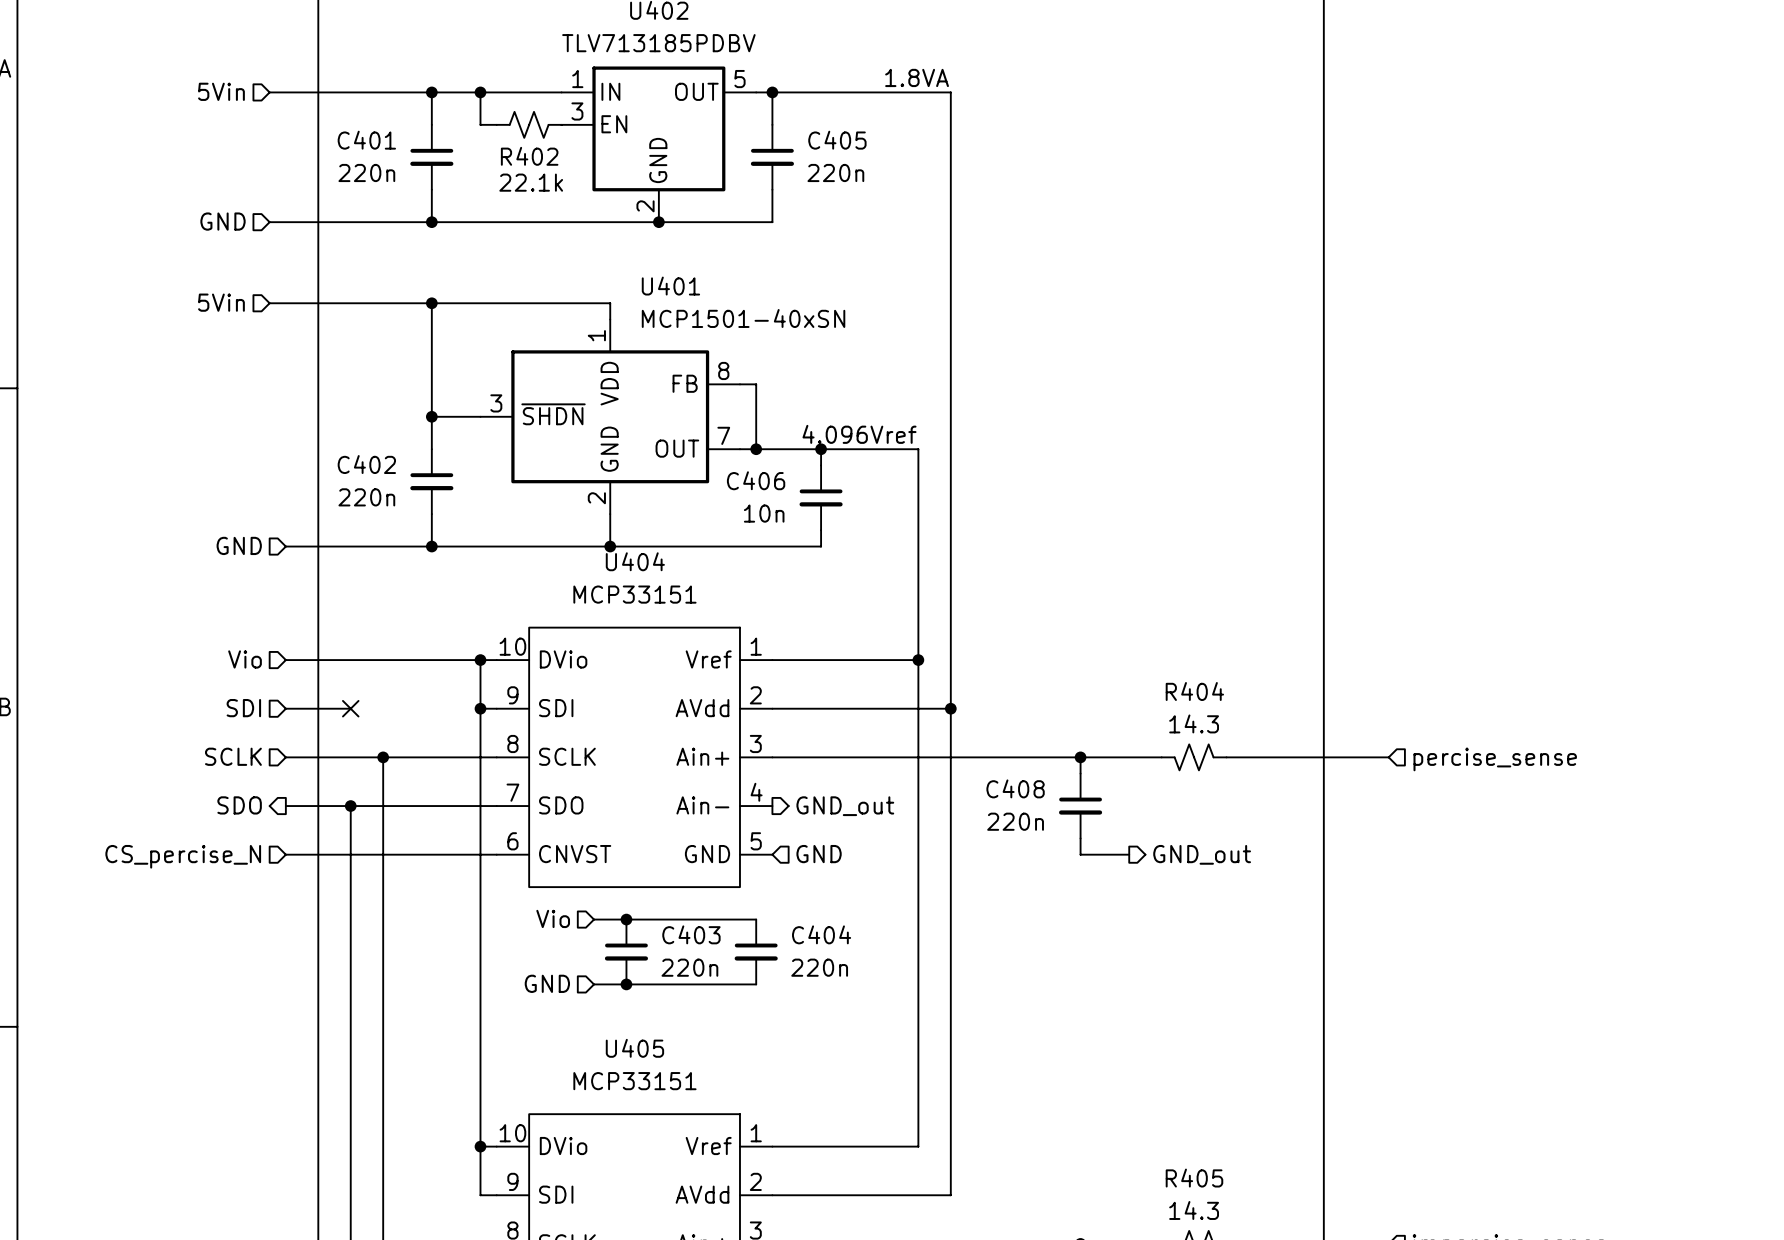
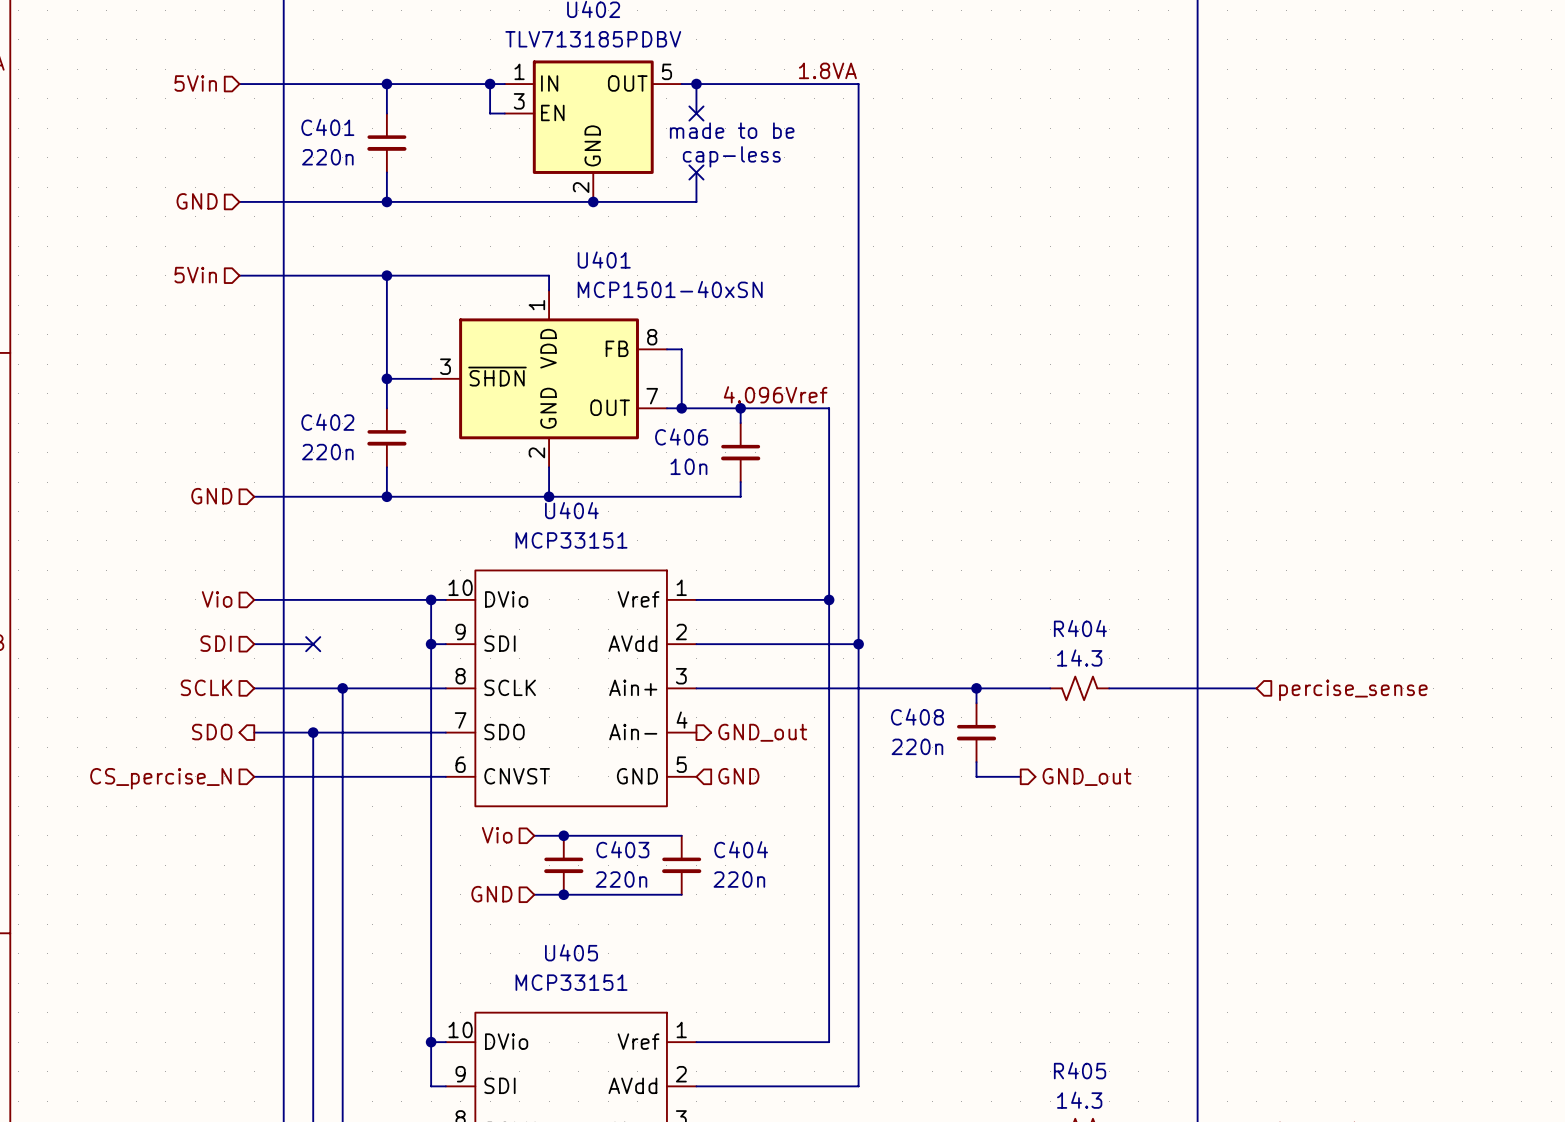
wire: (480, 92) (480, 124) (496, 124) -> (490, 84) (490, 113) (504, 113)
junction position: (480, 92) -> (490, 84)
R402: 22.1k (529, 124) -> none
no-connect mark: none -> (696, 113)
text: none -> made to be (732, 130)
C405: 220n (772, 157) -> none
text: none -> cap-less (731, 156)
no-connect mark: none -> (696, 172)

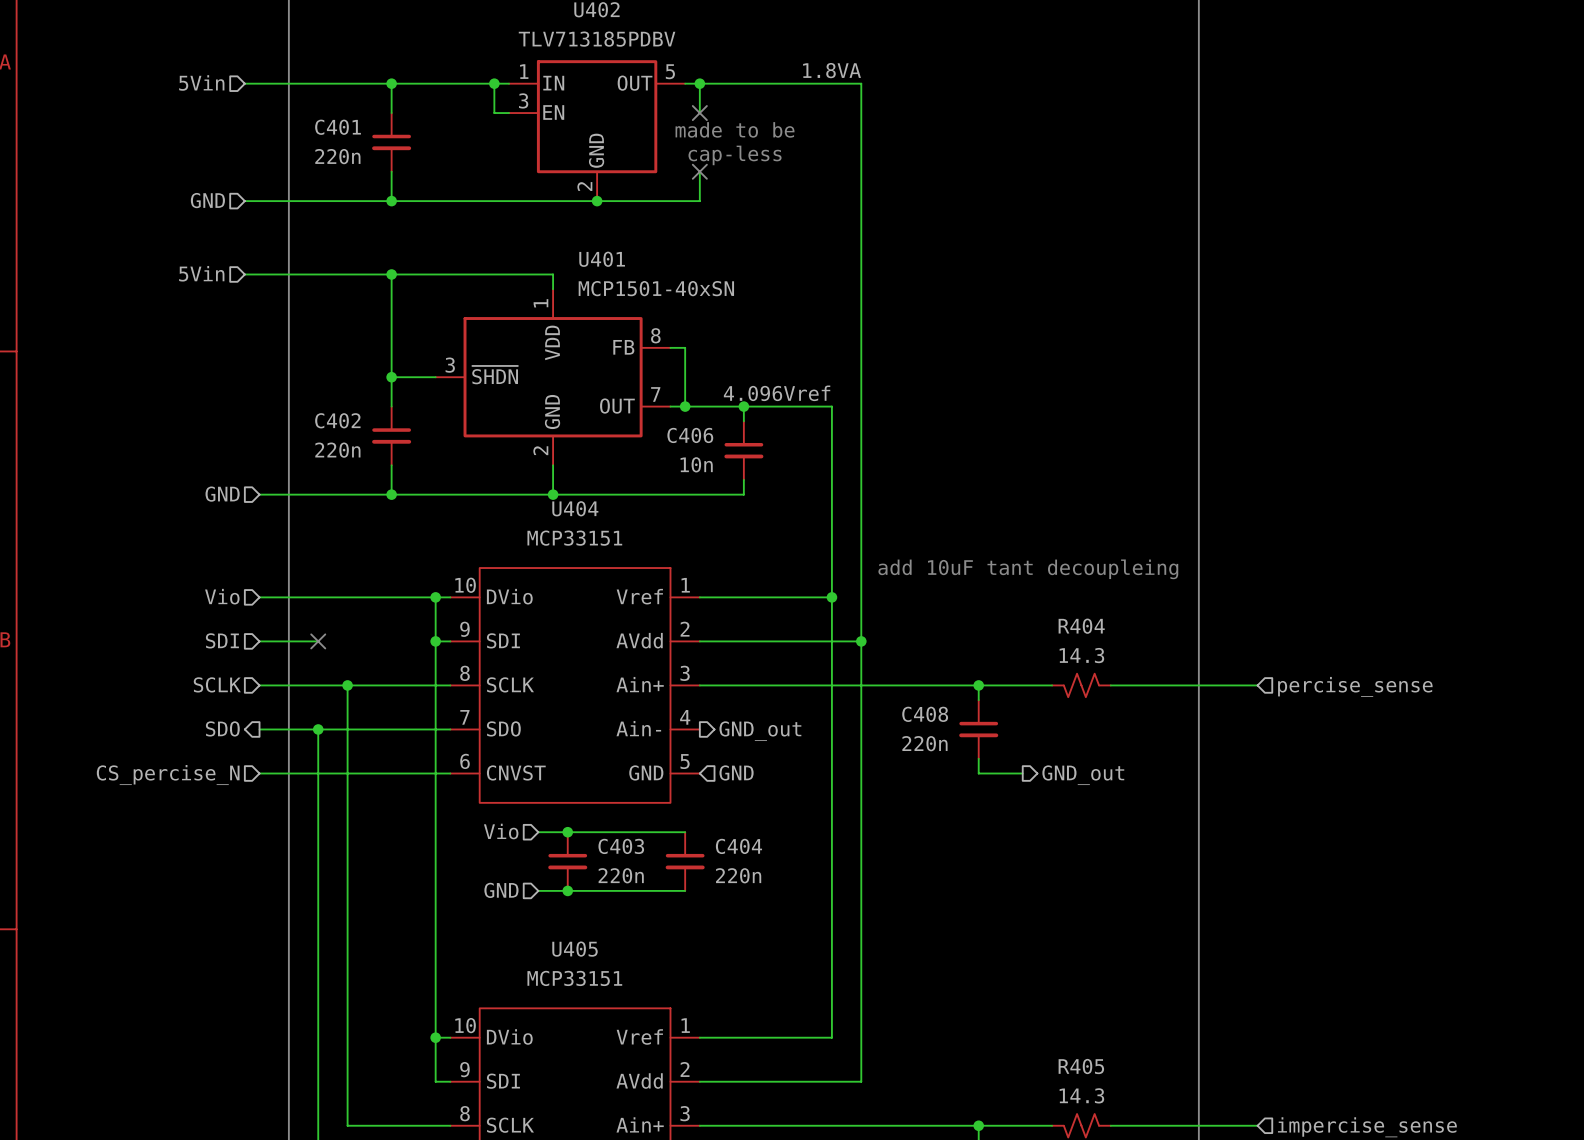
text: none -> add 10uF tant decoupleing (1028, 569)

